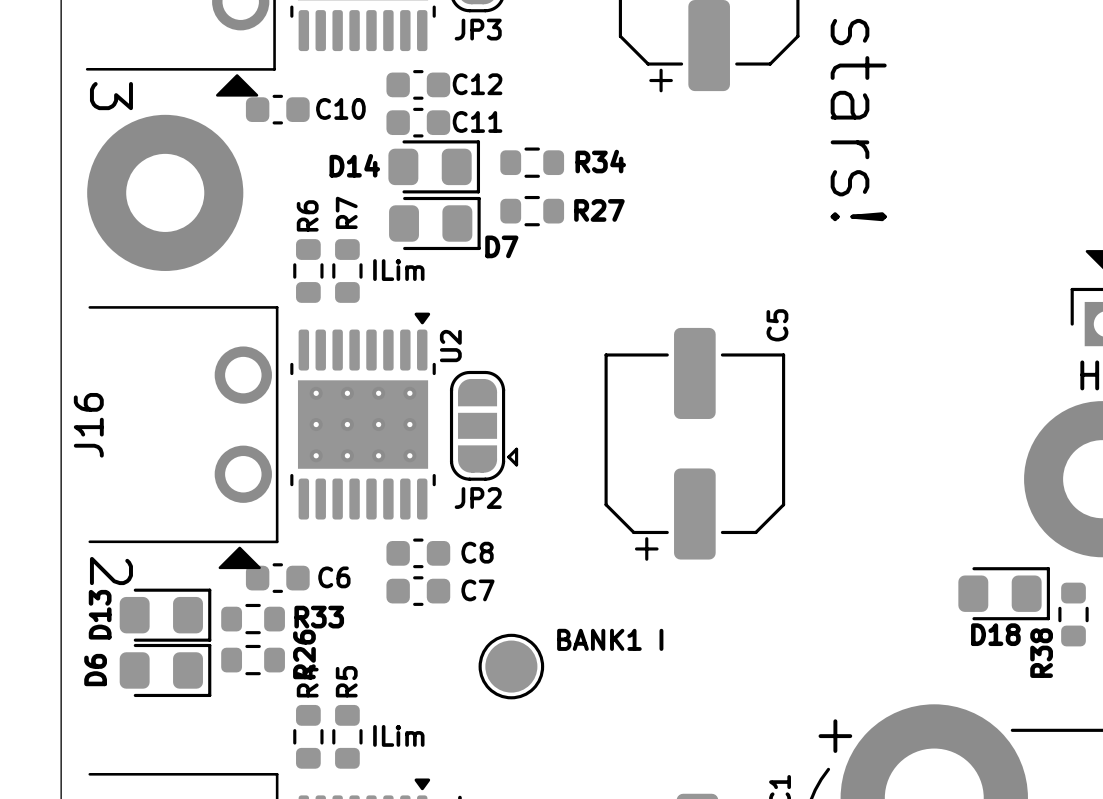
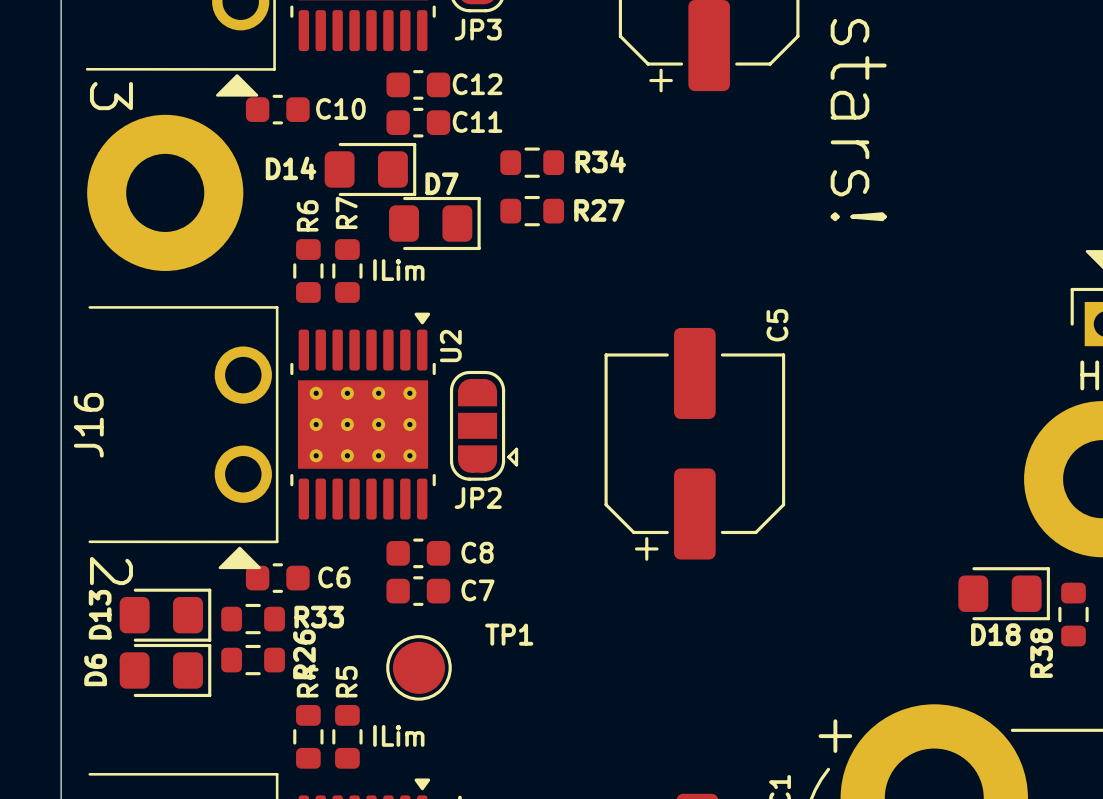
D14 position: (434, 166) -> (370, 169)
D7 name position: D7 (501, 246) -> D7 (441, 183)
text: BANK1 I (610, 639) -> none
part: (511, 666) -> none
TP1: none -> (418, 667)

